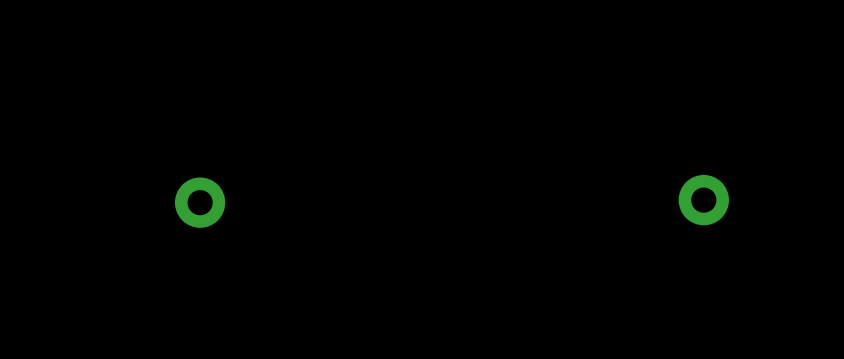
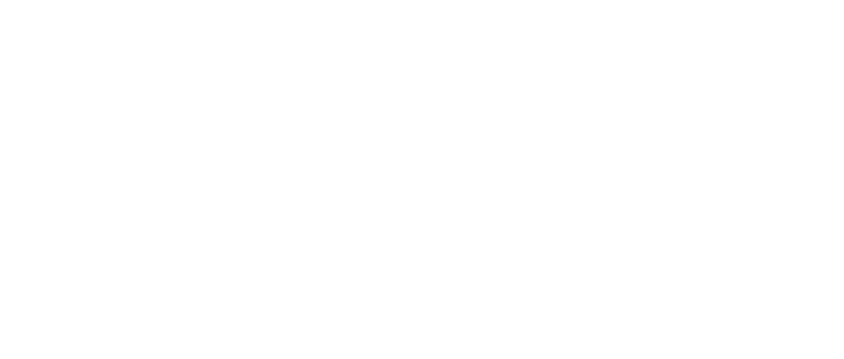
via: (703, 200) -> none
via: (200, 202) -> none

